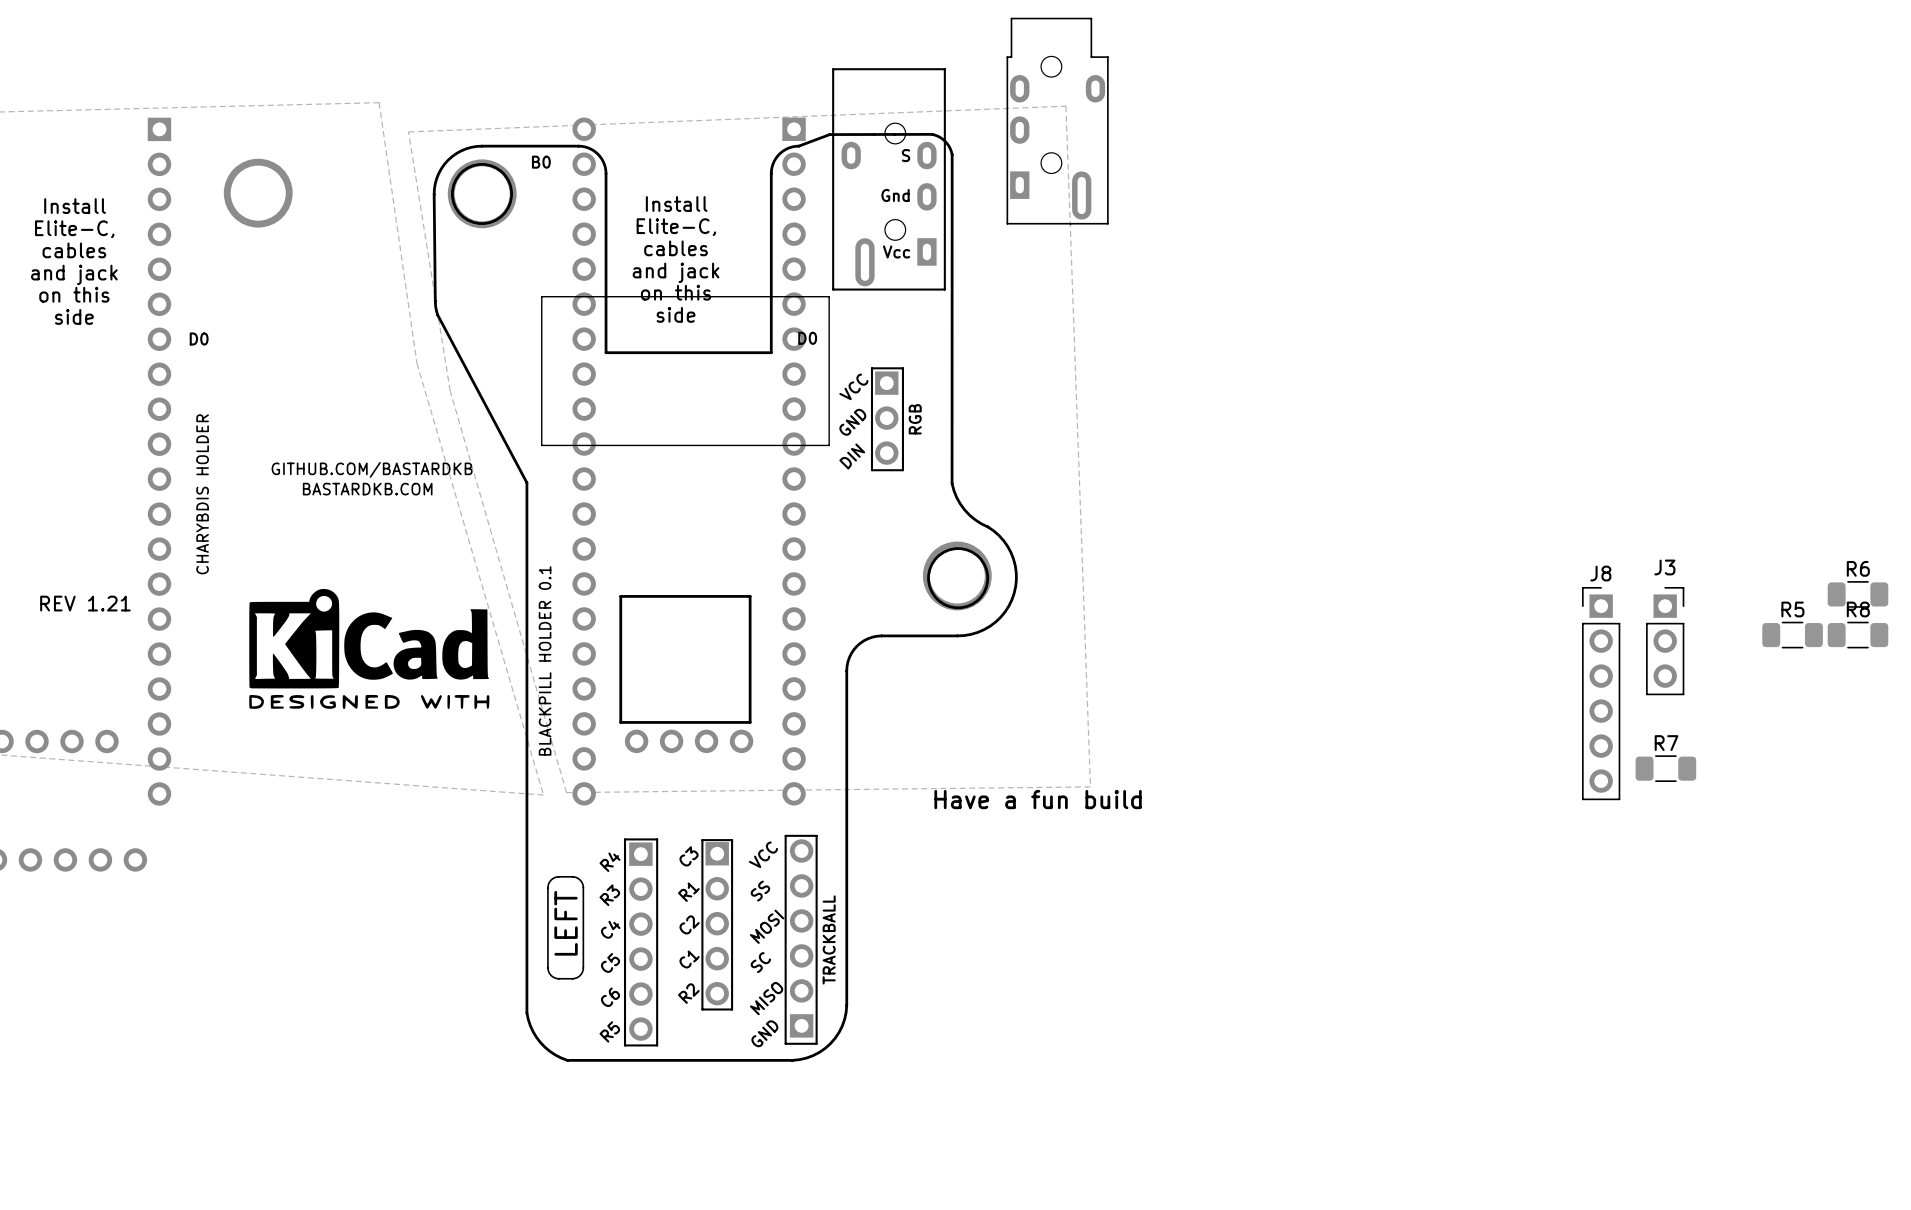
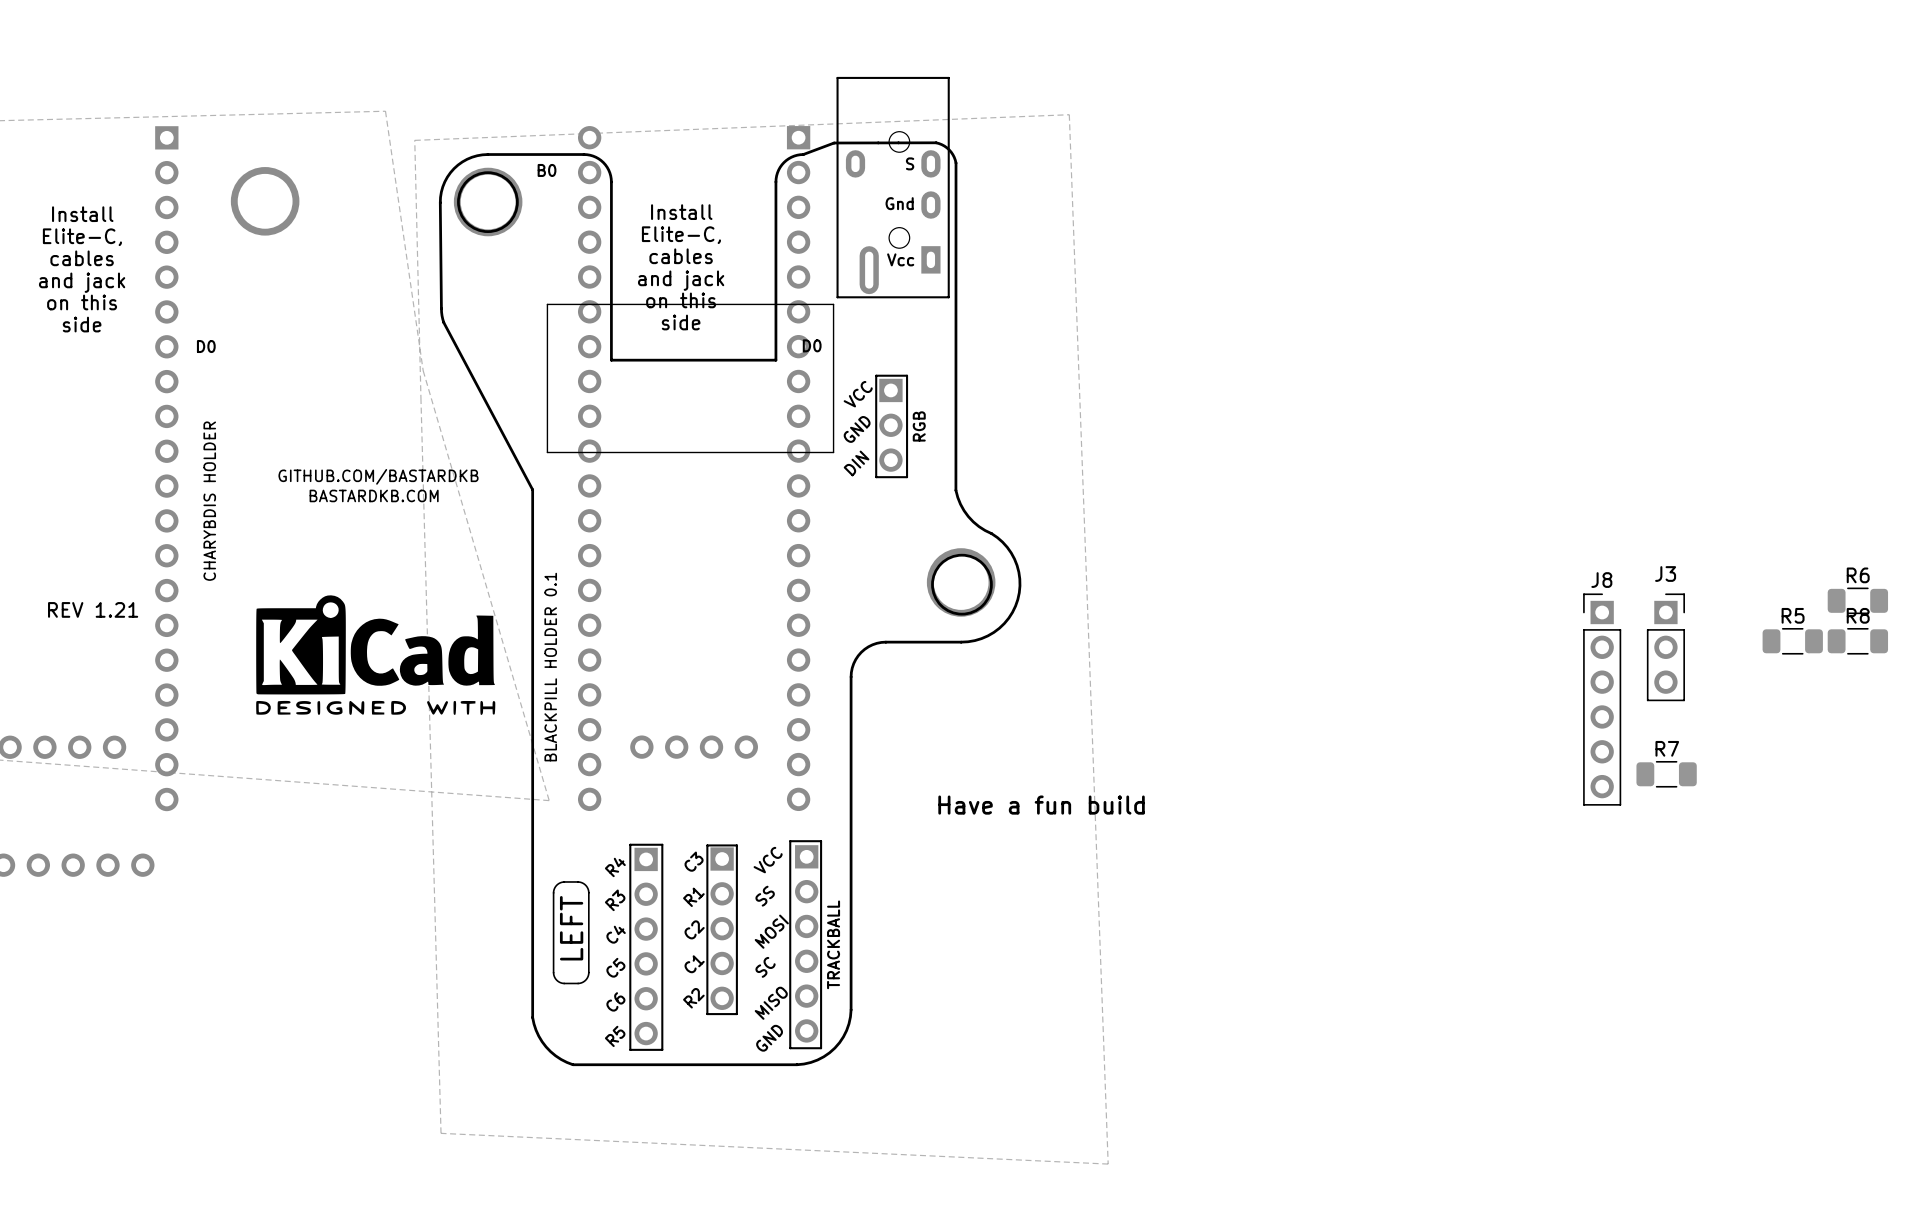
zone outline: (1065, 106) (1090, 786) (566, 792) (450, 390) (408, 131) -> (1069, 114) (1108, 1164) (441, 1133) (414, 140)
part: (1057, 121) -> none
board edge: (620, 596) (620, 722) (750, 722) (750, 596) (620, 596) -> none
part rotation: 0° (801, 938) -> 180° (806, 943)

